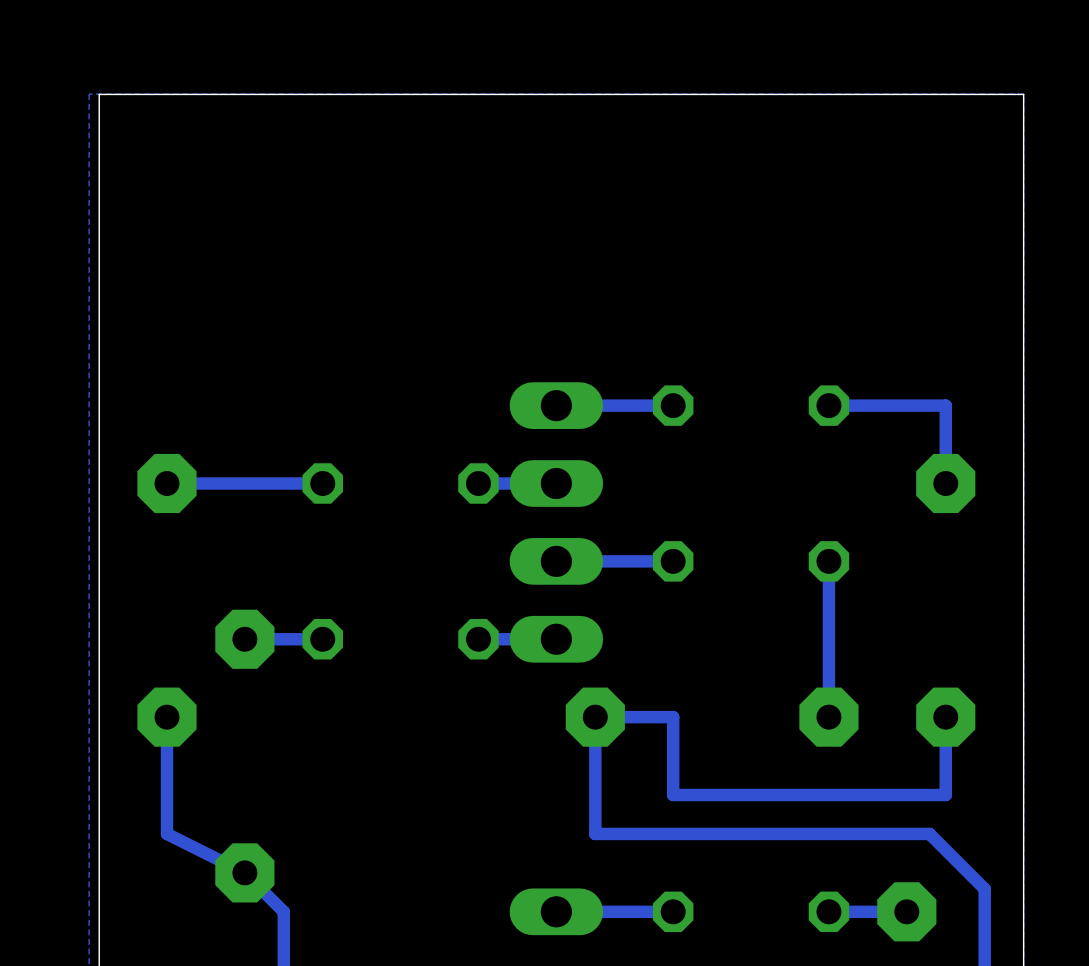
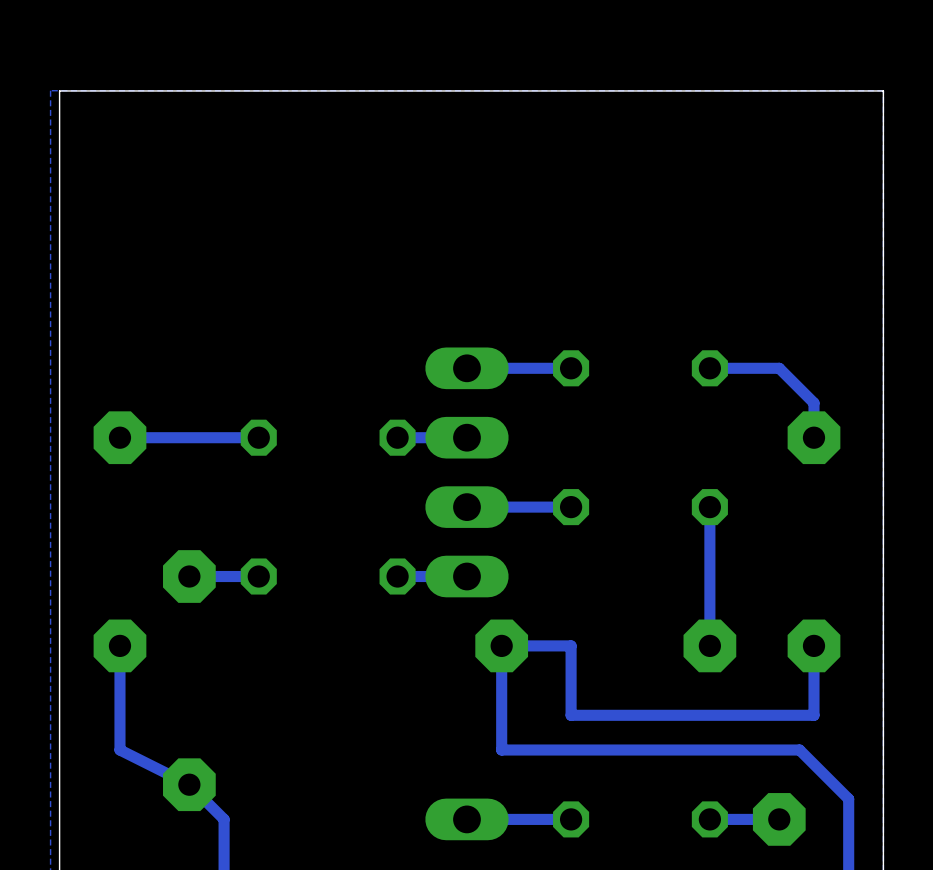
bottom track: (906, 405) (945, 405) (945, 444) -> (779, 368) (813, 403)

